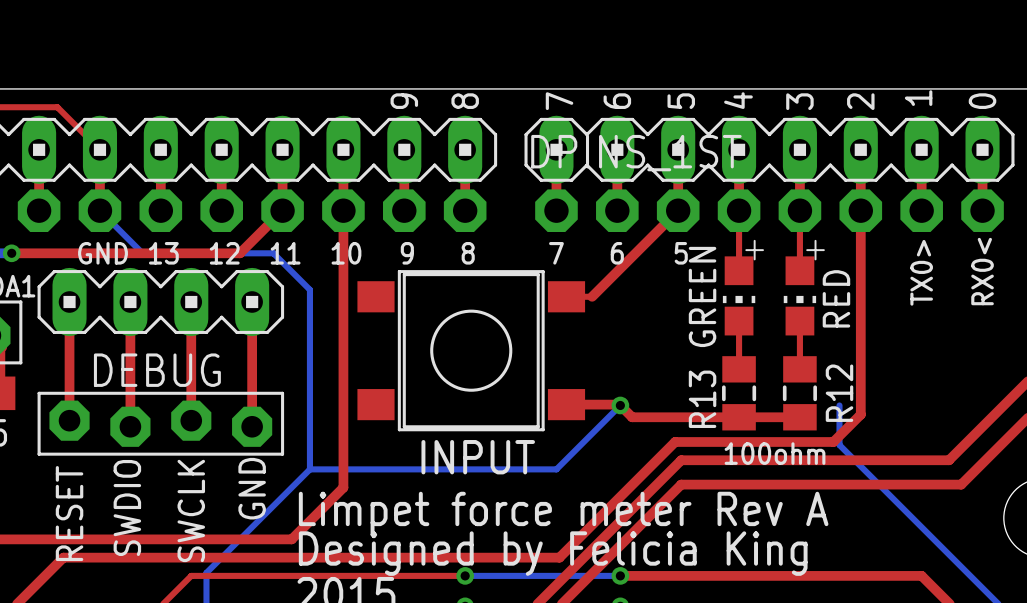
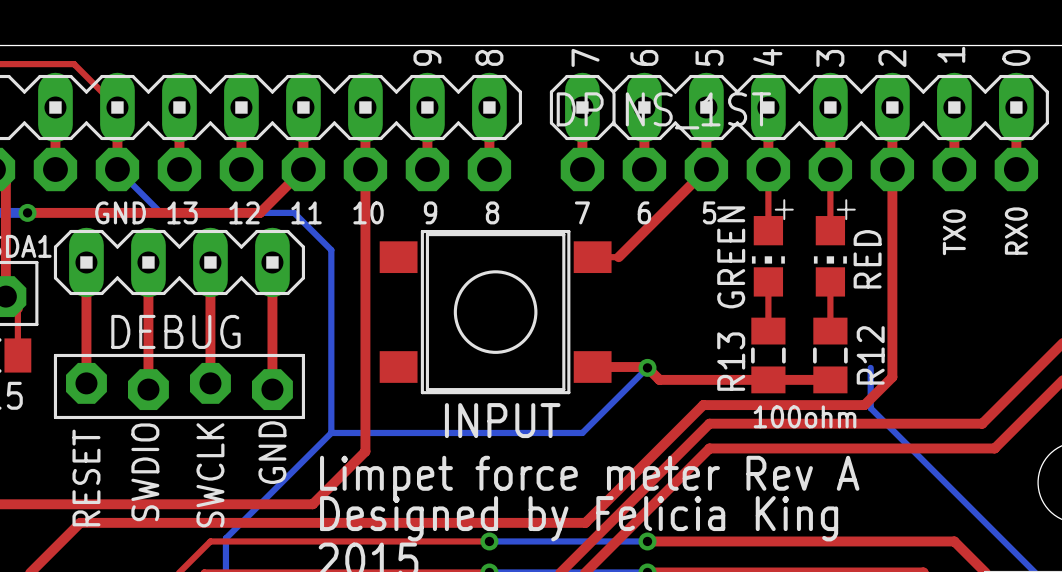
text: RX0< (982, 271) -> RX0 (1016, 231)
text: TX0> (921, 272) -> TX0 (954, 232)

